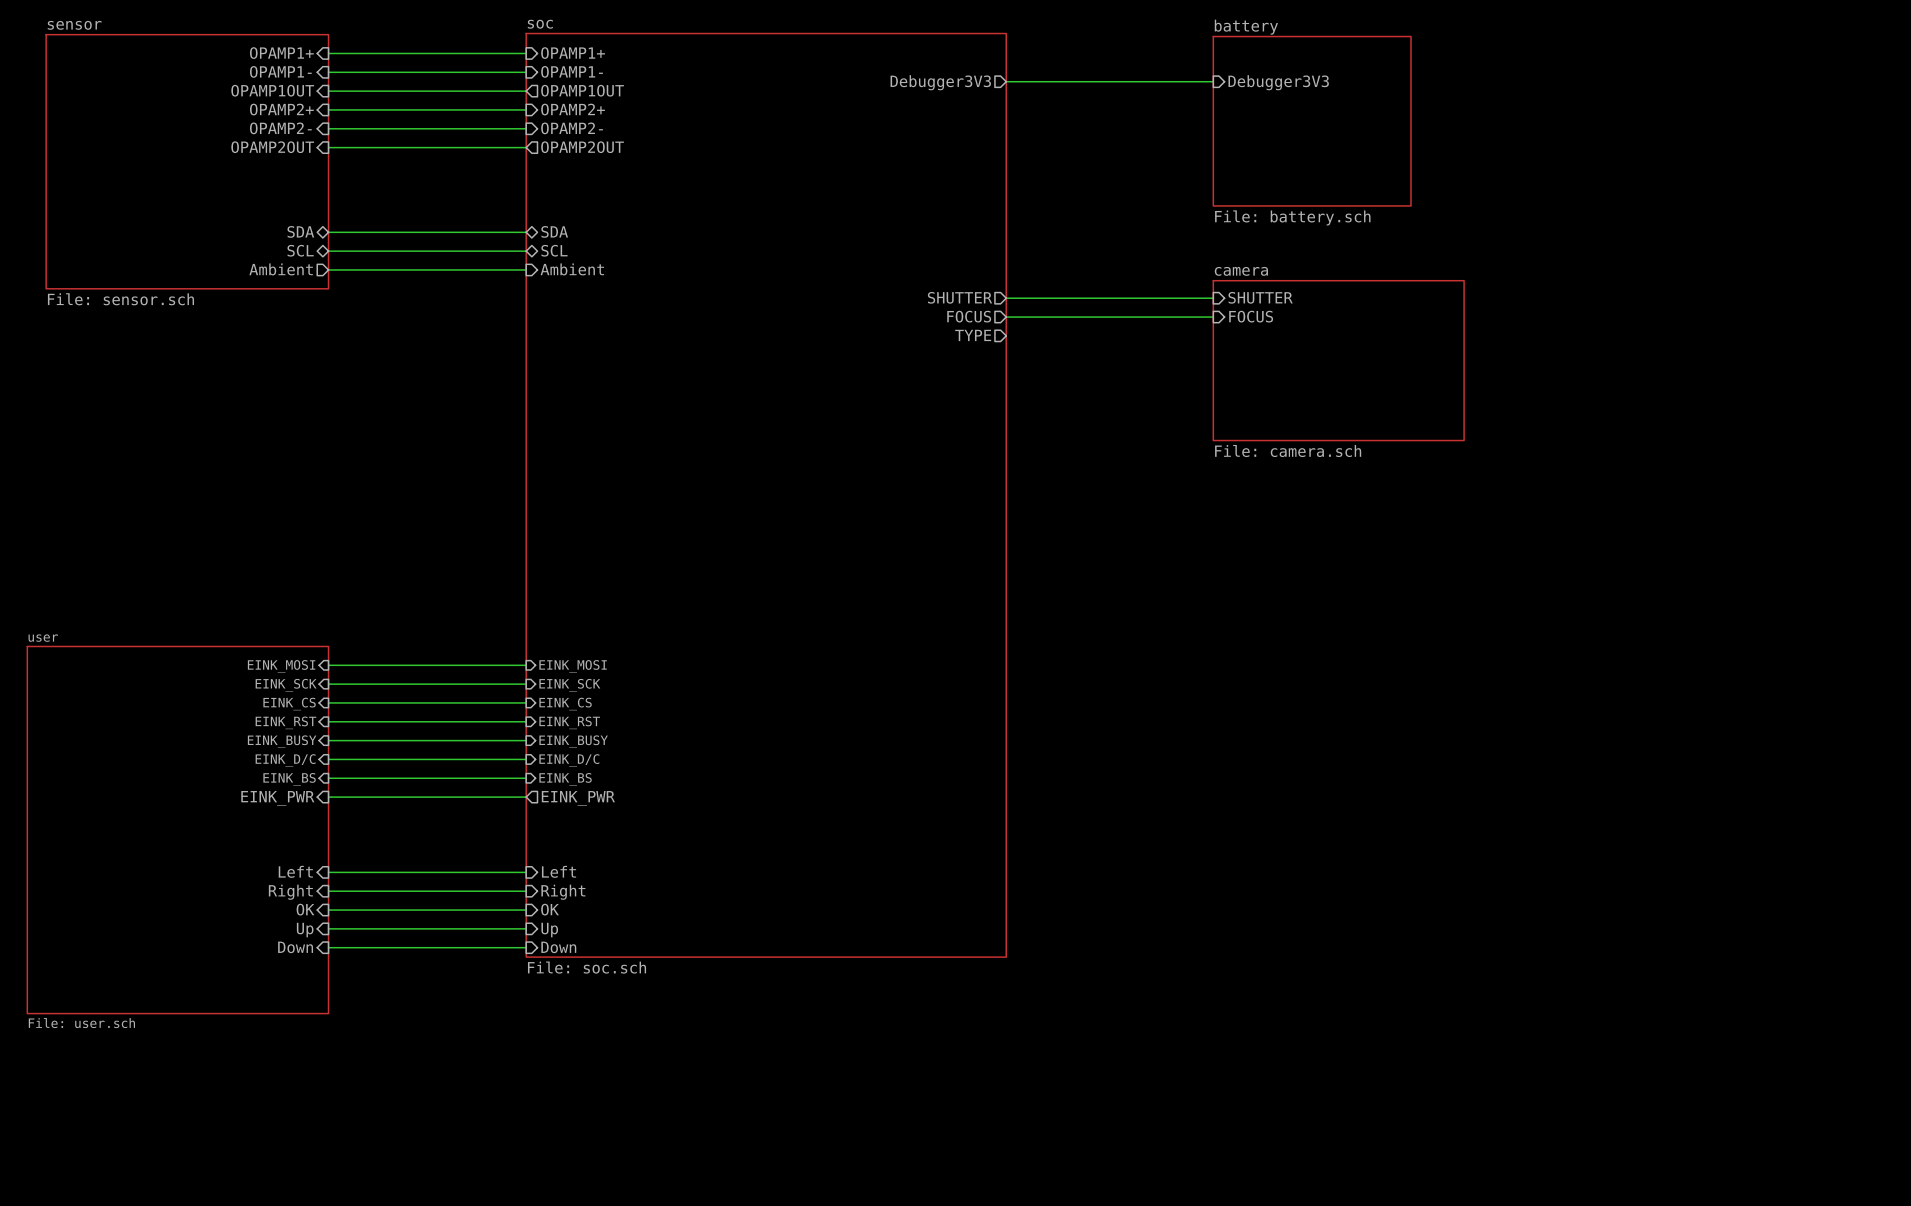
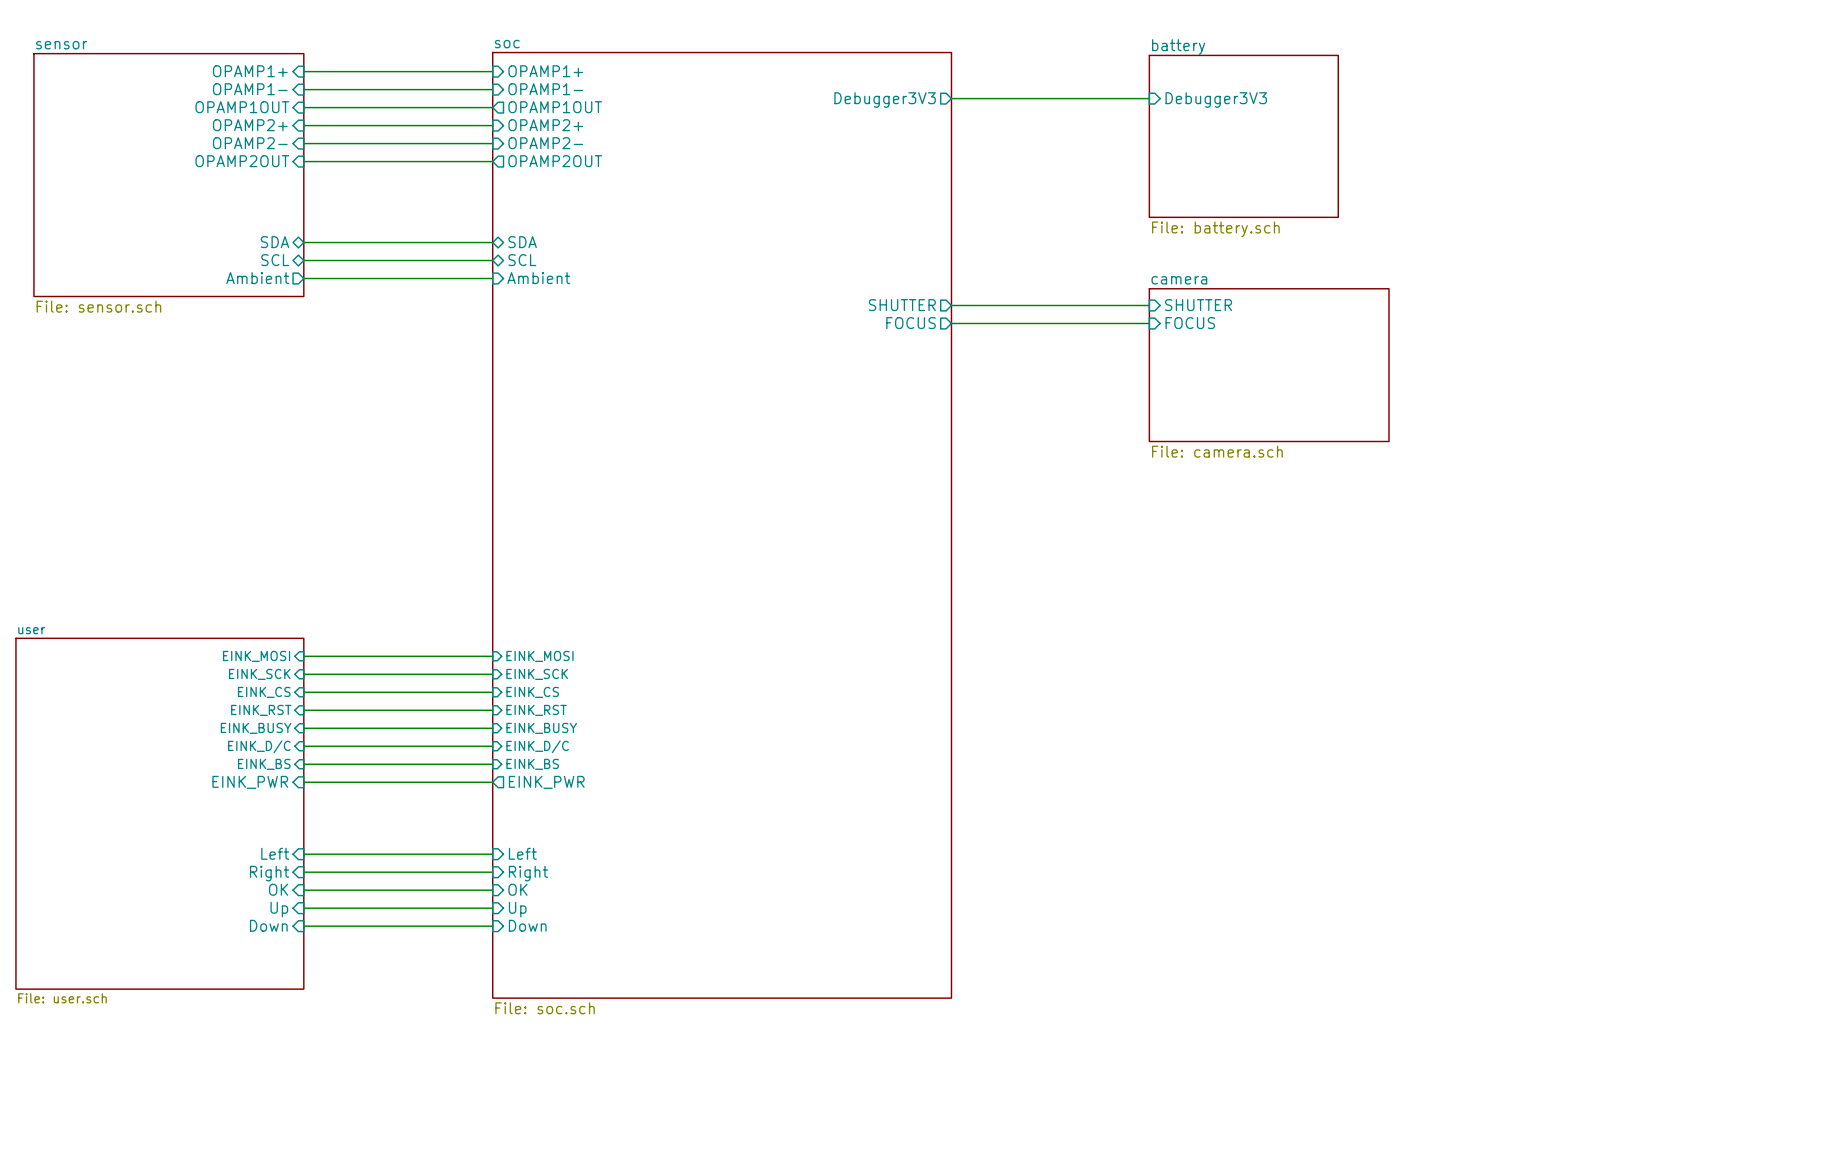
sheet pin: TYPE (973, 335) -> none
sheet soc: File: soc.sch (766, 495) -> none
sheet soc: none -> File: soc.sch (722, 525)

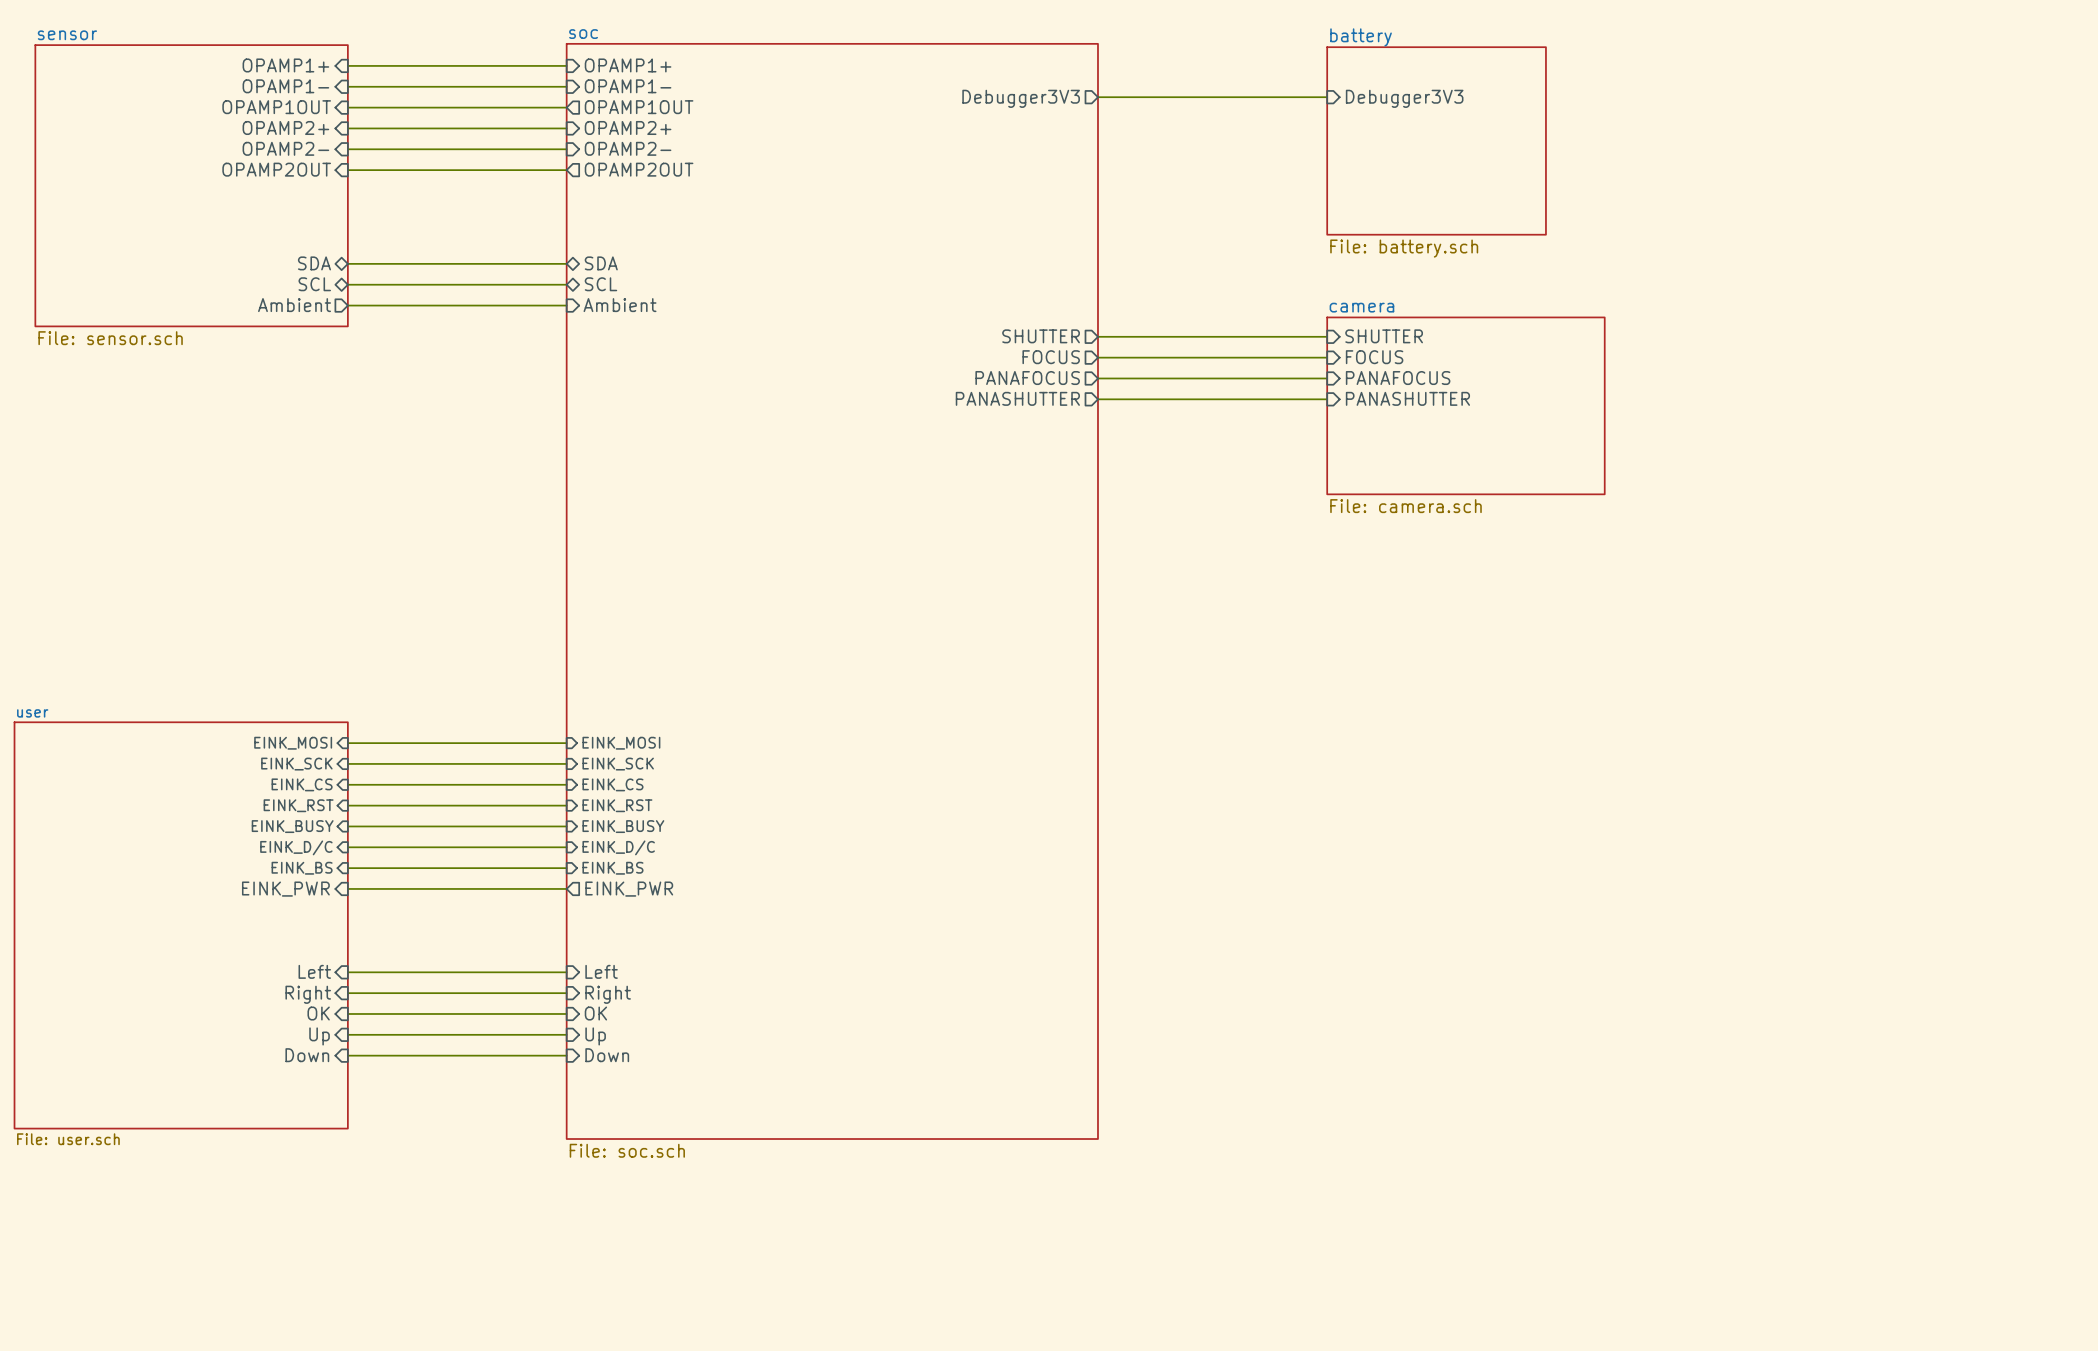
sheet pin: none -> PANAFOCUS (1027, 378)
wire: none -> (1097, 378) (1327, 378)
sheet pin: none -> PANAFOCUS (1398, 378)
sheet pin: none -> PANASHUTTER (1017, 398)
wire: none -> (1097, 399) (1327, 399)
sheet pin: none -> PANASHUTTER (1407, 398)

